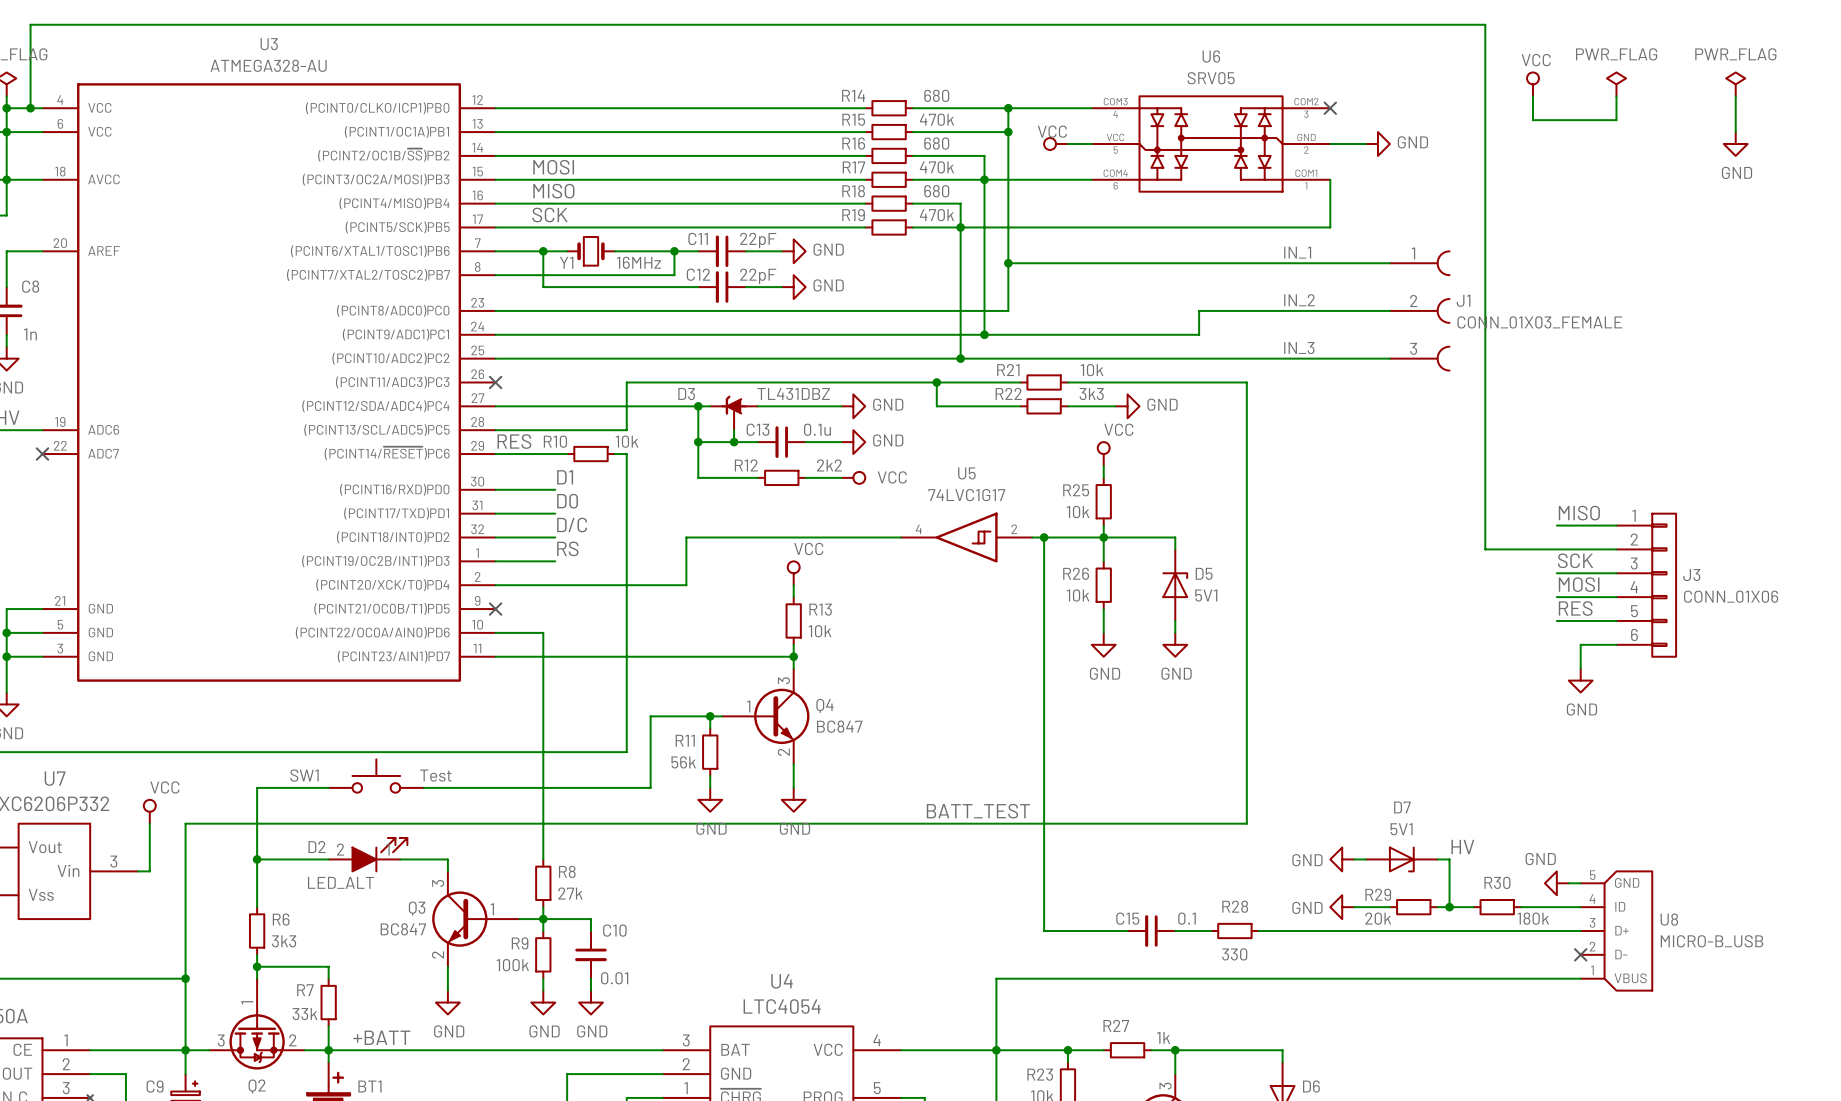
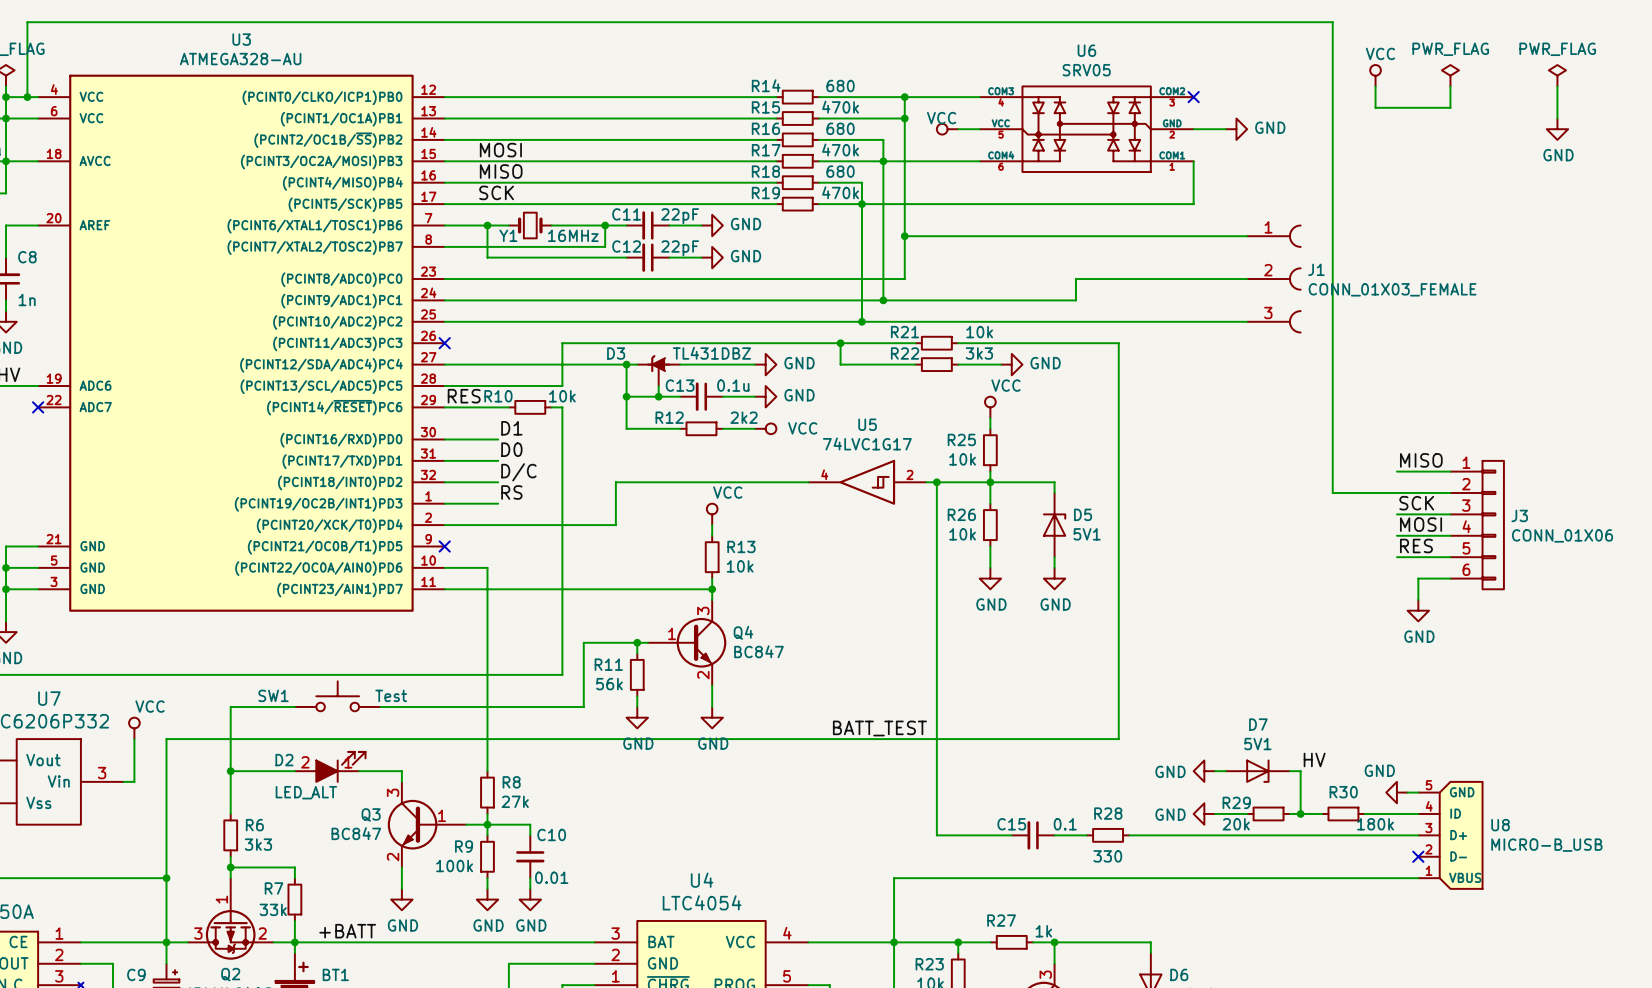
label: IN_1 (1297, 252) -> none
label: IN_2 (1299, 300) -> none
label: IN_3 (1299, 348) -> none

